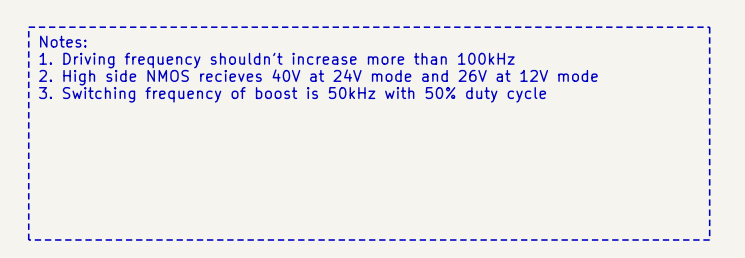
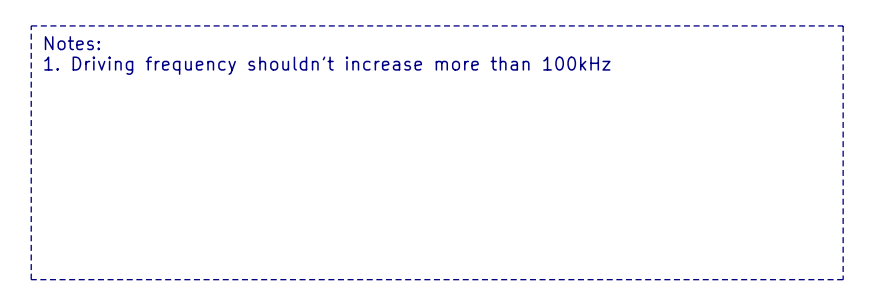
text: 2. High side NMOS recieves 40V at 24V mode and 26V at 12V mode (318, 77) -> none
text: 3. Switching frequency of boost is 50kHz with 50% duty cycle (292, 94) -> none

